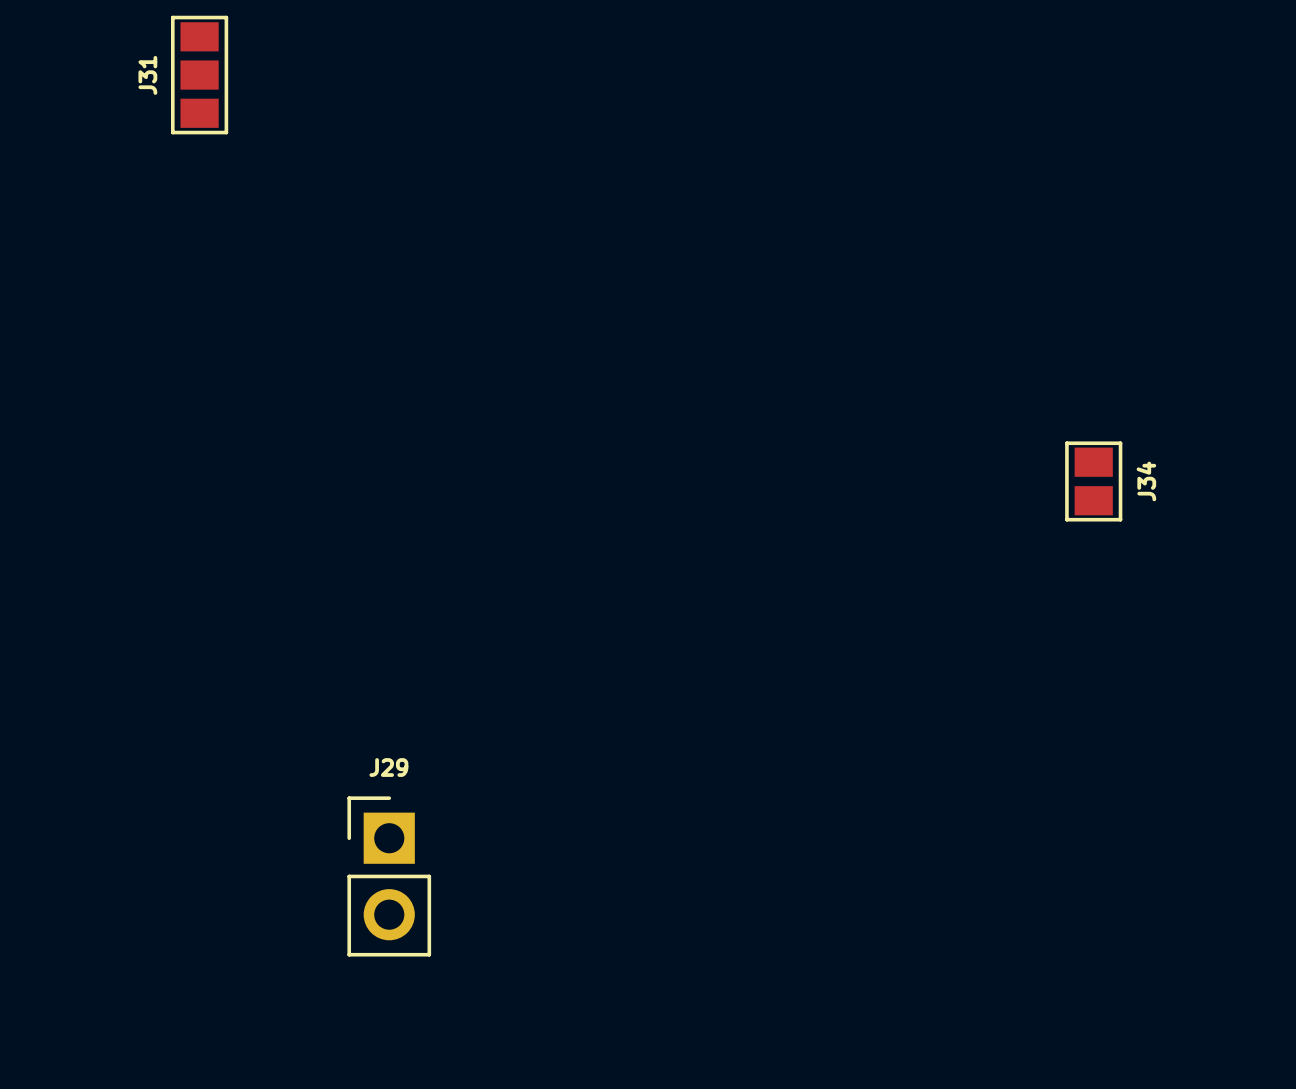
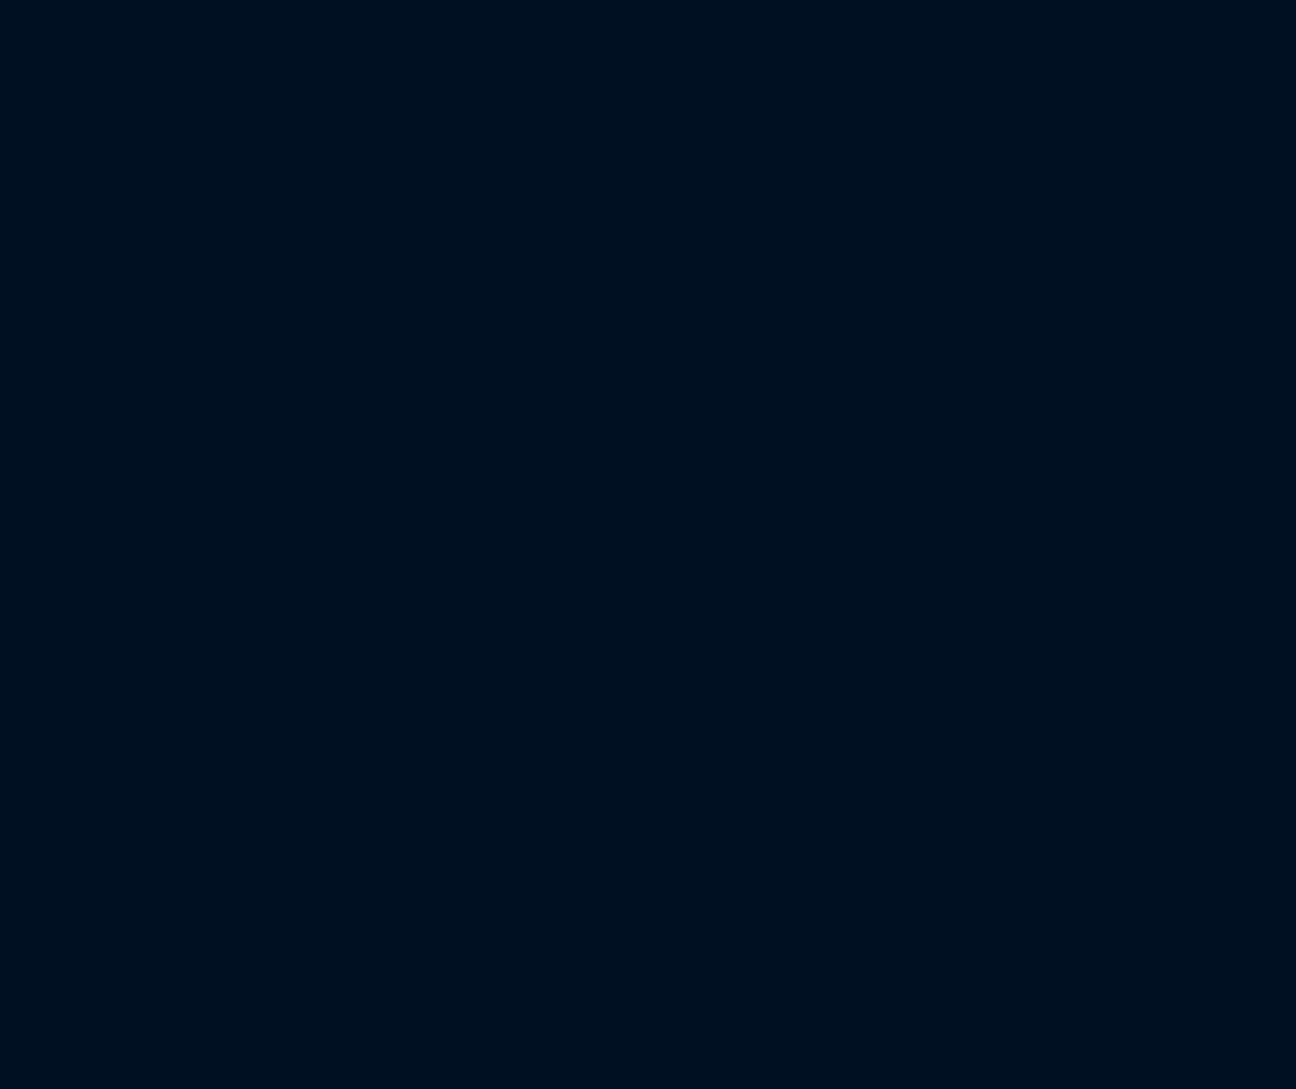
J31: (199, 75) -> none
J34: (1093, 481) -> none
J29: (389, 876) -> none

